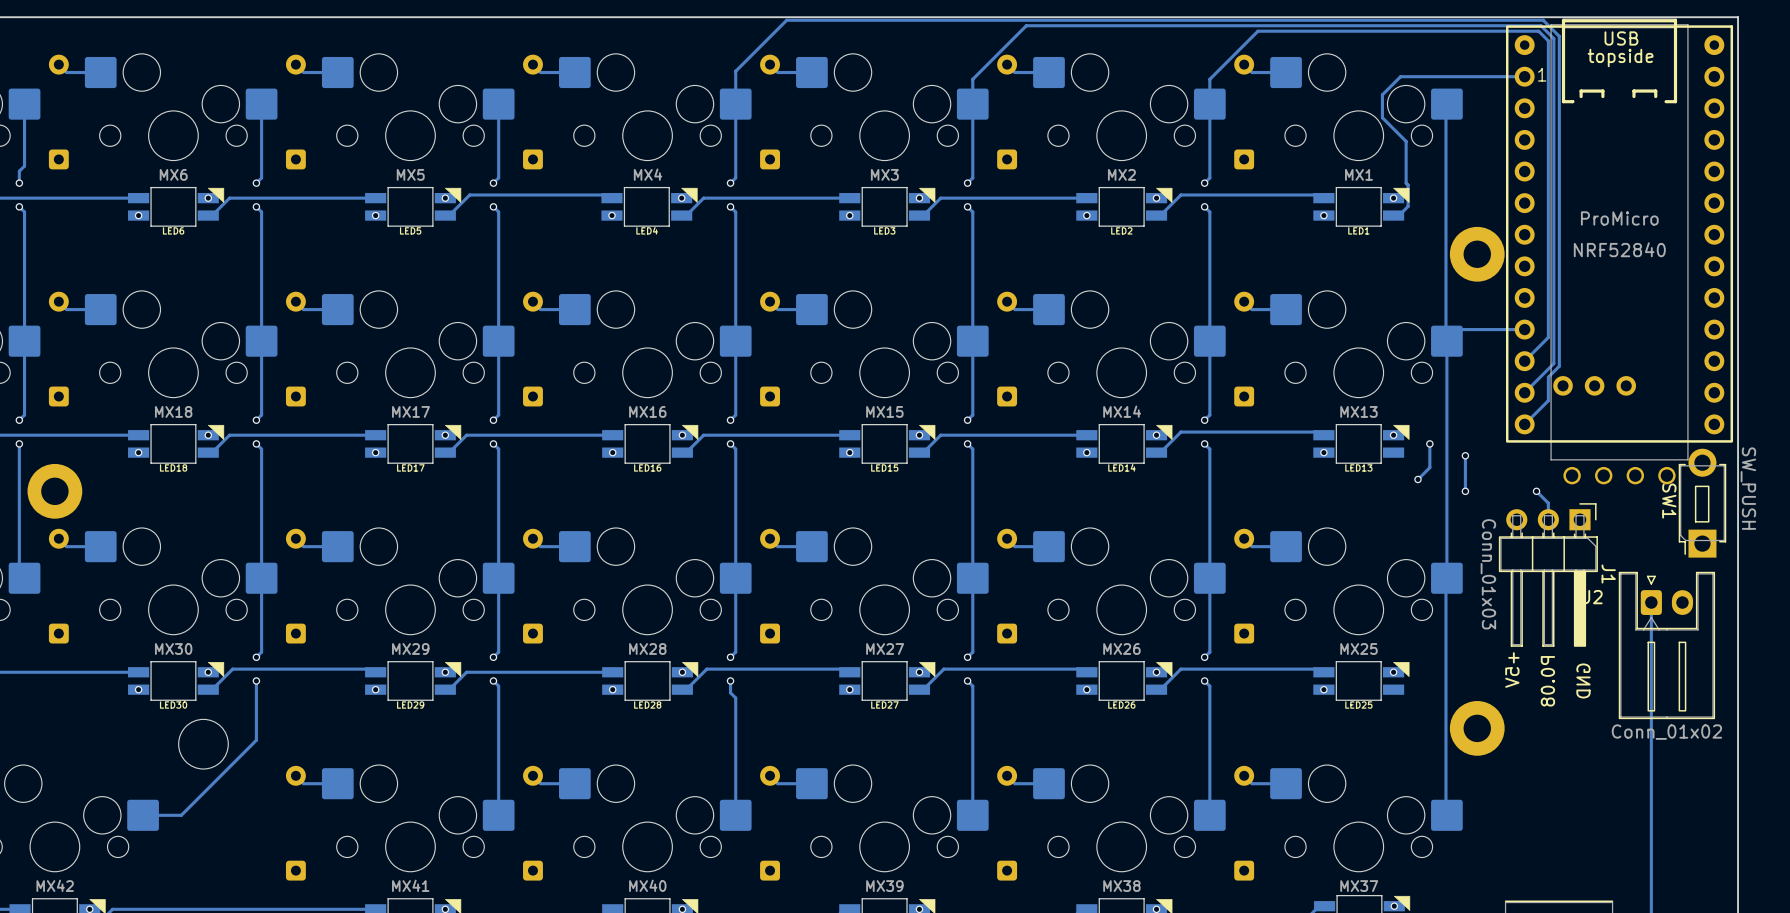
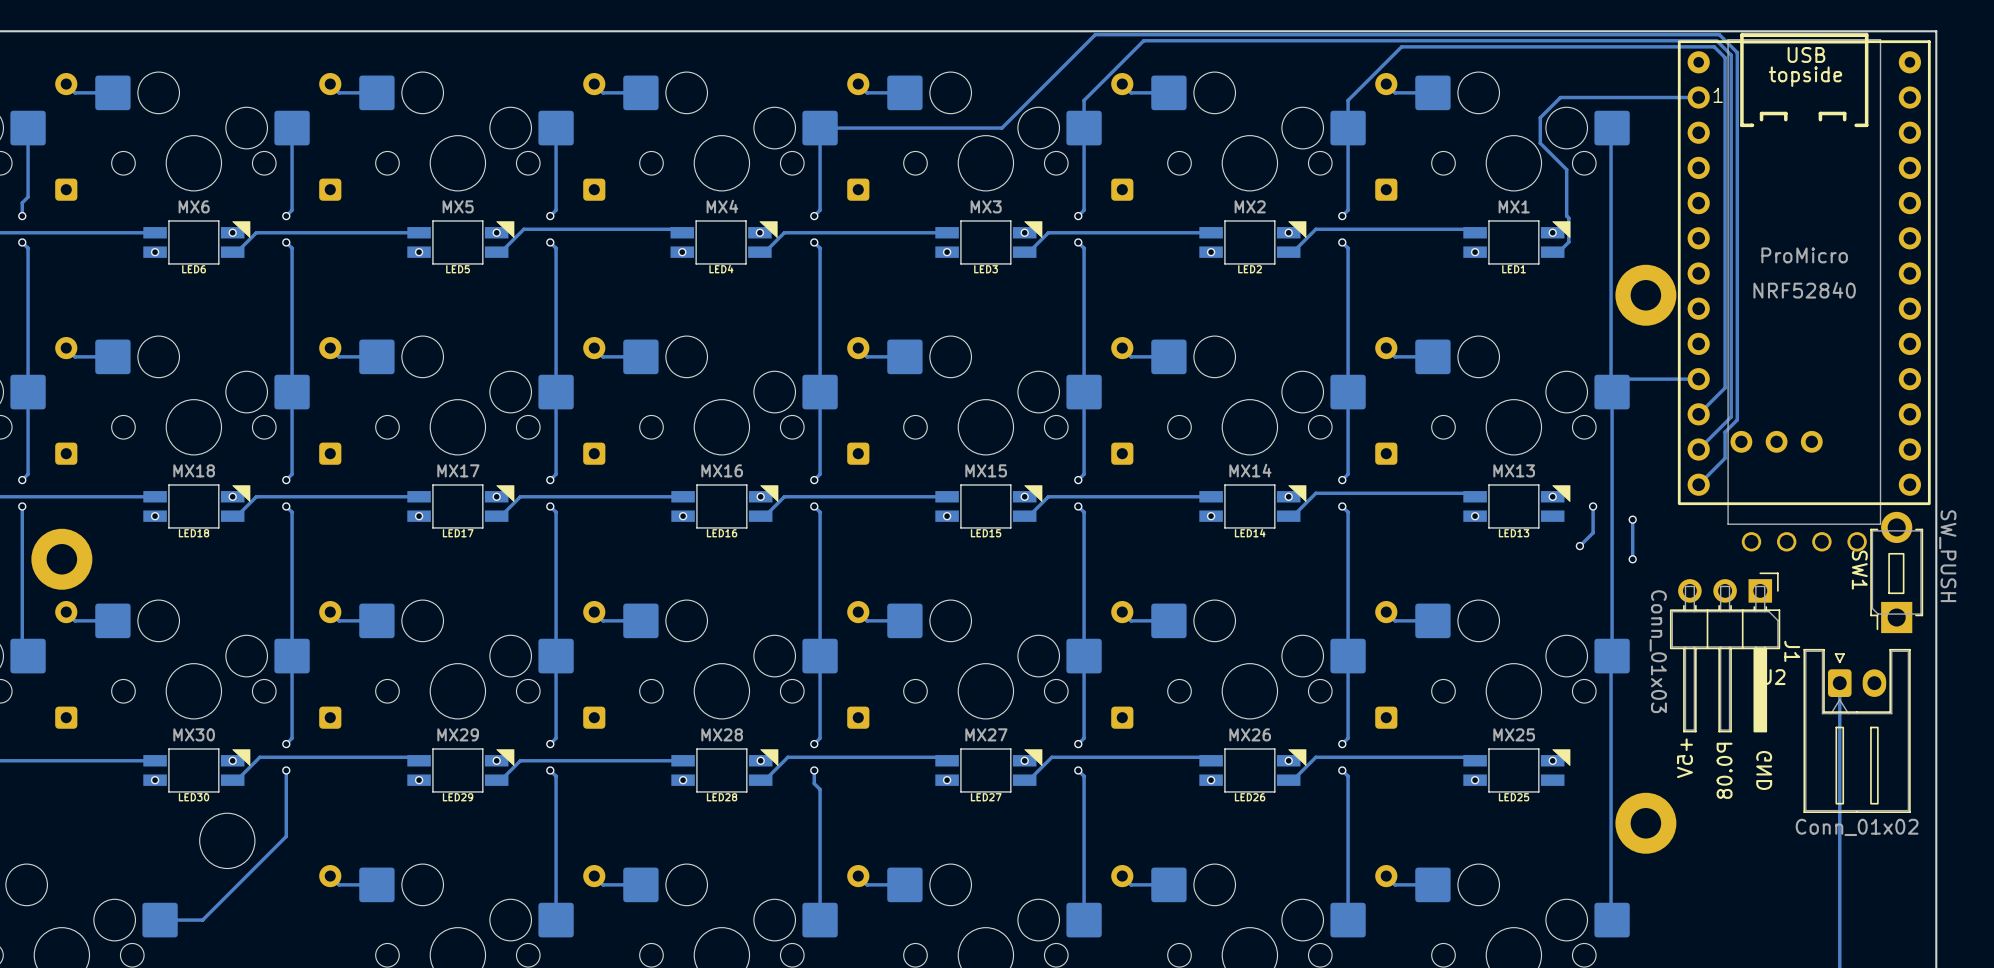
track: (982, 20) (786, 20) (735, 71) (735, 104) -> (1095, 34) (1001, 128) (820, 128)
track: (1536, 491) (1548, 503) (1548, 519) -> none
via: (1536, 491) -> none

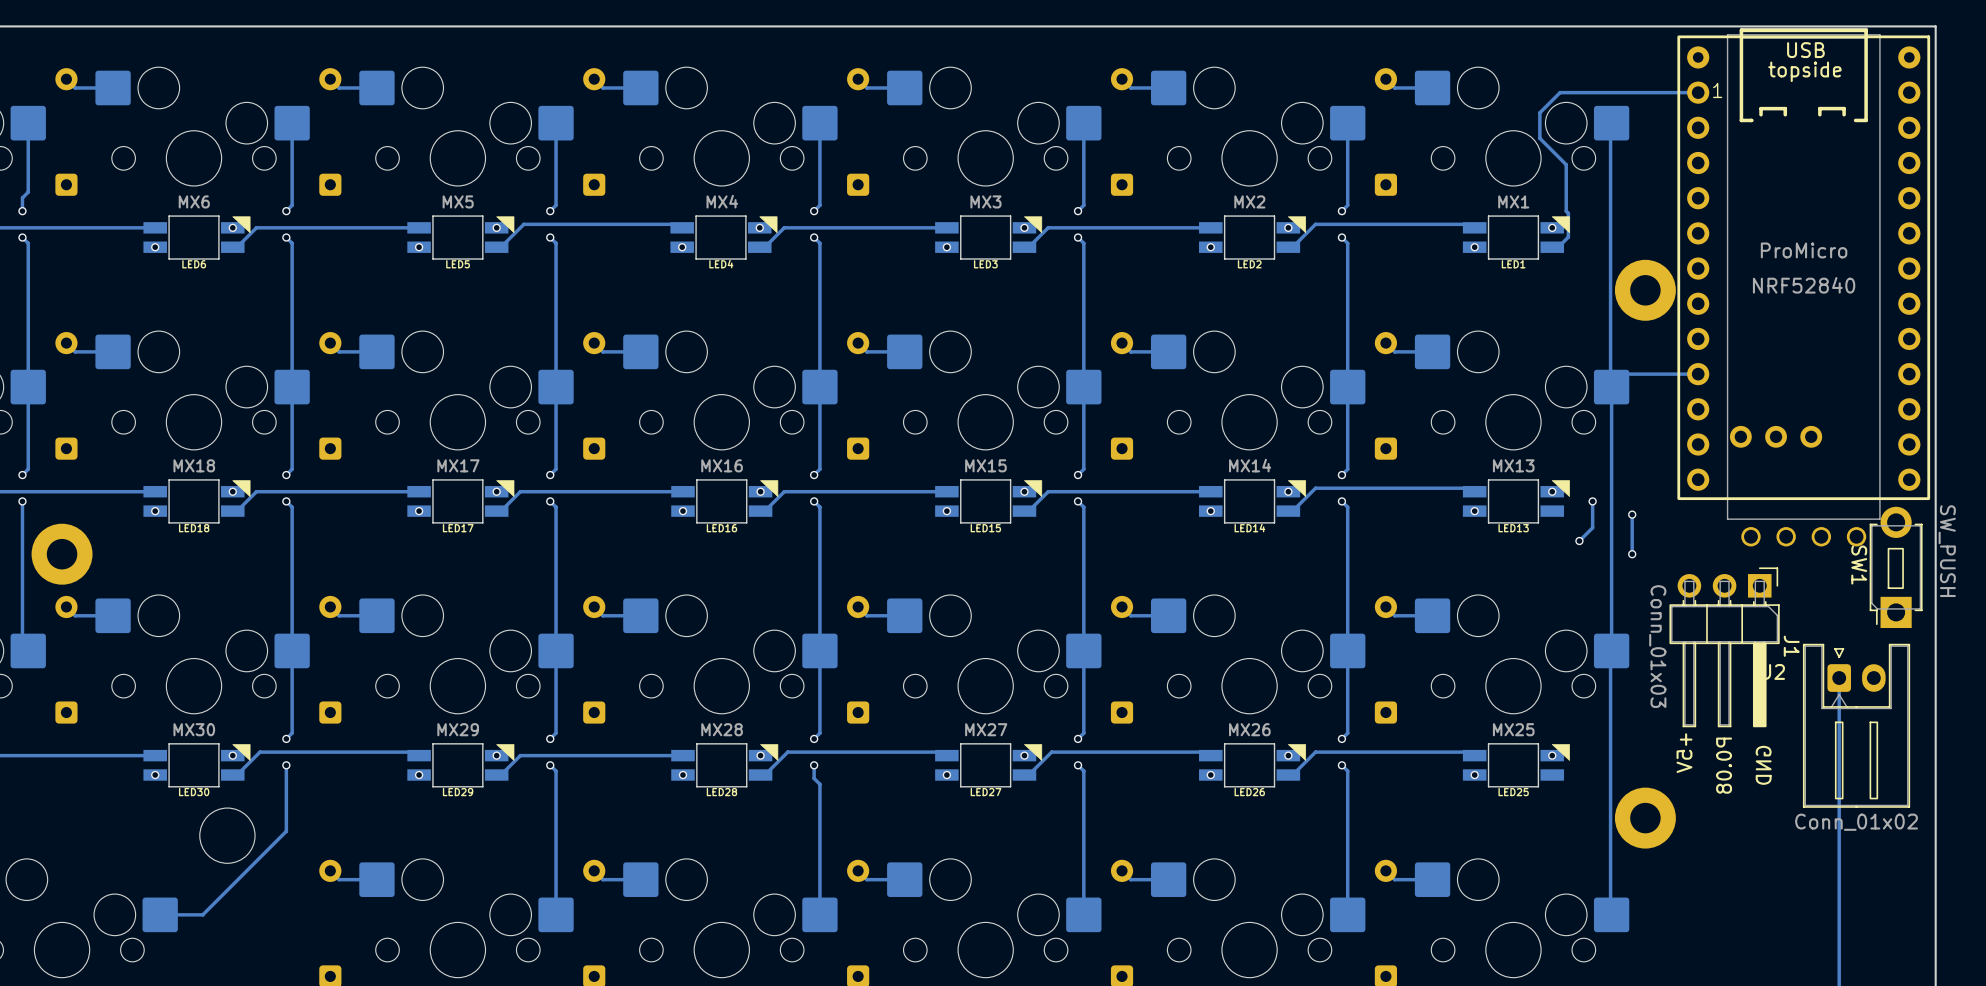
track: (820, 128) (1001, 128) (1095, 34) (1719, 34) (1737, 52) (1737, 419) (1725, 432) (1725, 458) (1698, 484) -> none
track: (1084, 128) (1084, 100) (1143, 40) (1716, 40) (1731, 55) (1731, 417) (1698, 449) -> none
track: (1348, 128) (1348, 100) (1401, 46) (1714, 46) (1725, 57) (1725, 387) (1698, 414) -> none

